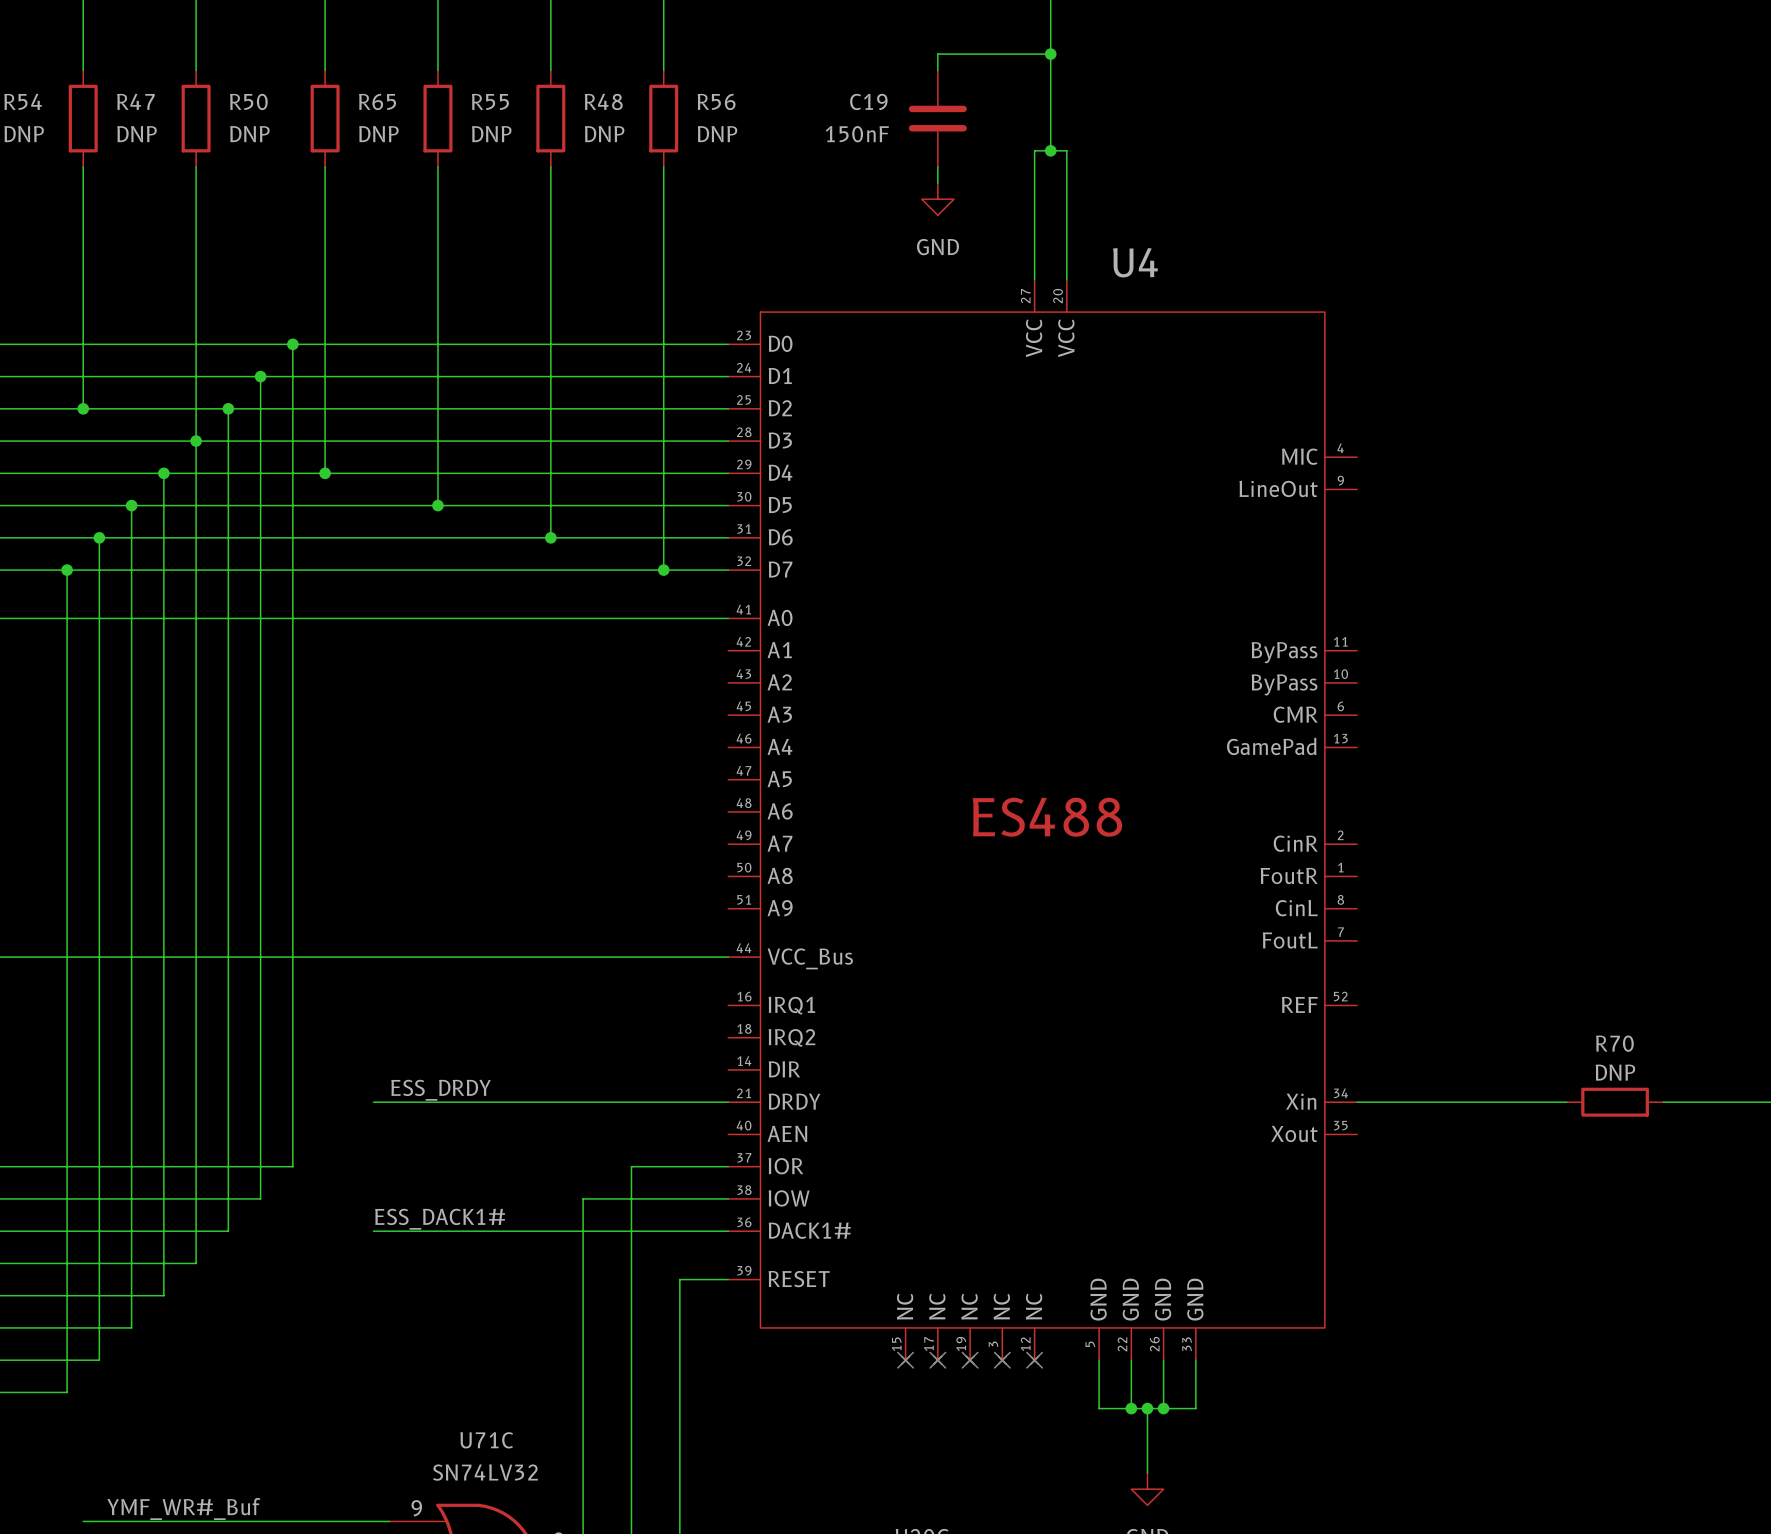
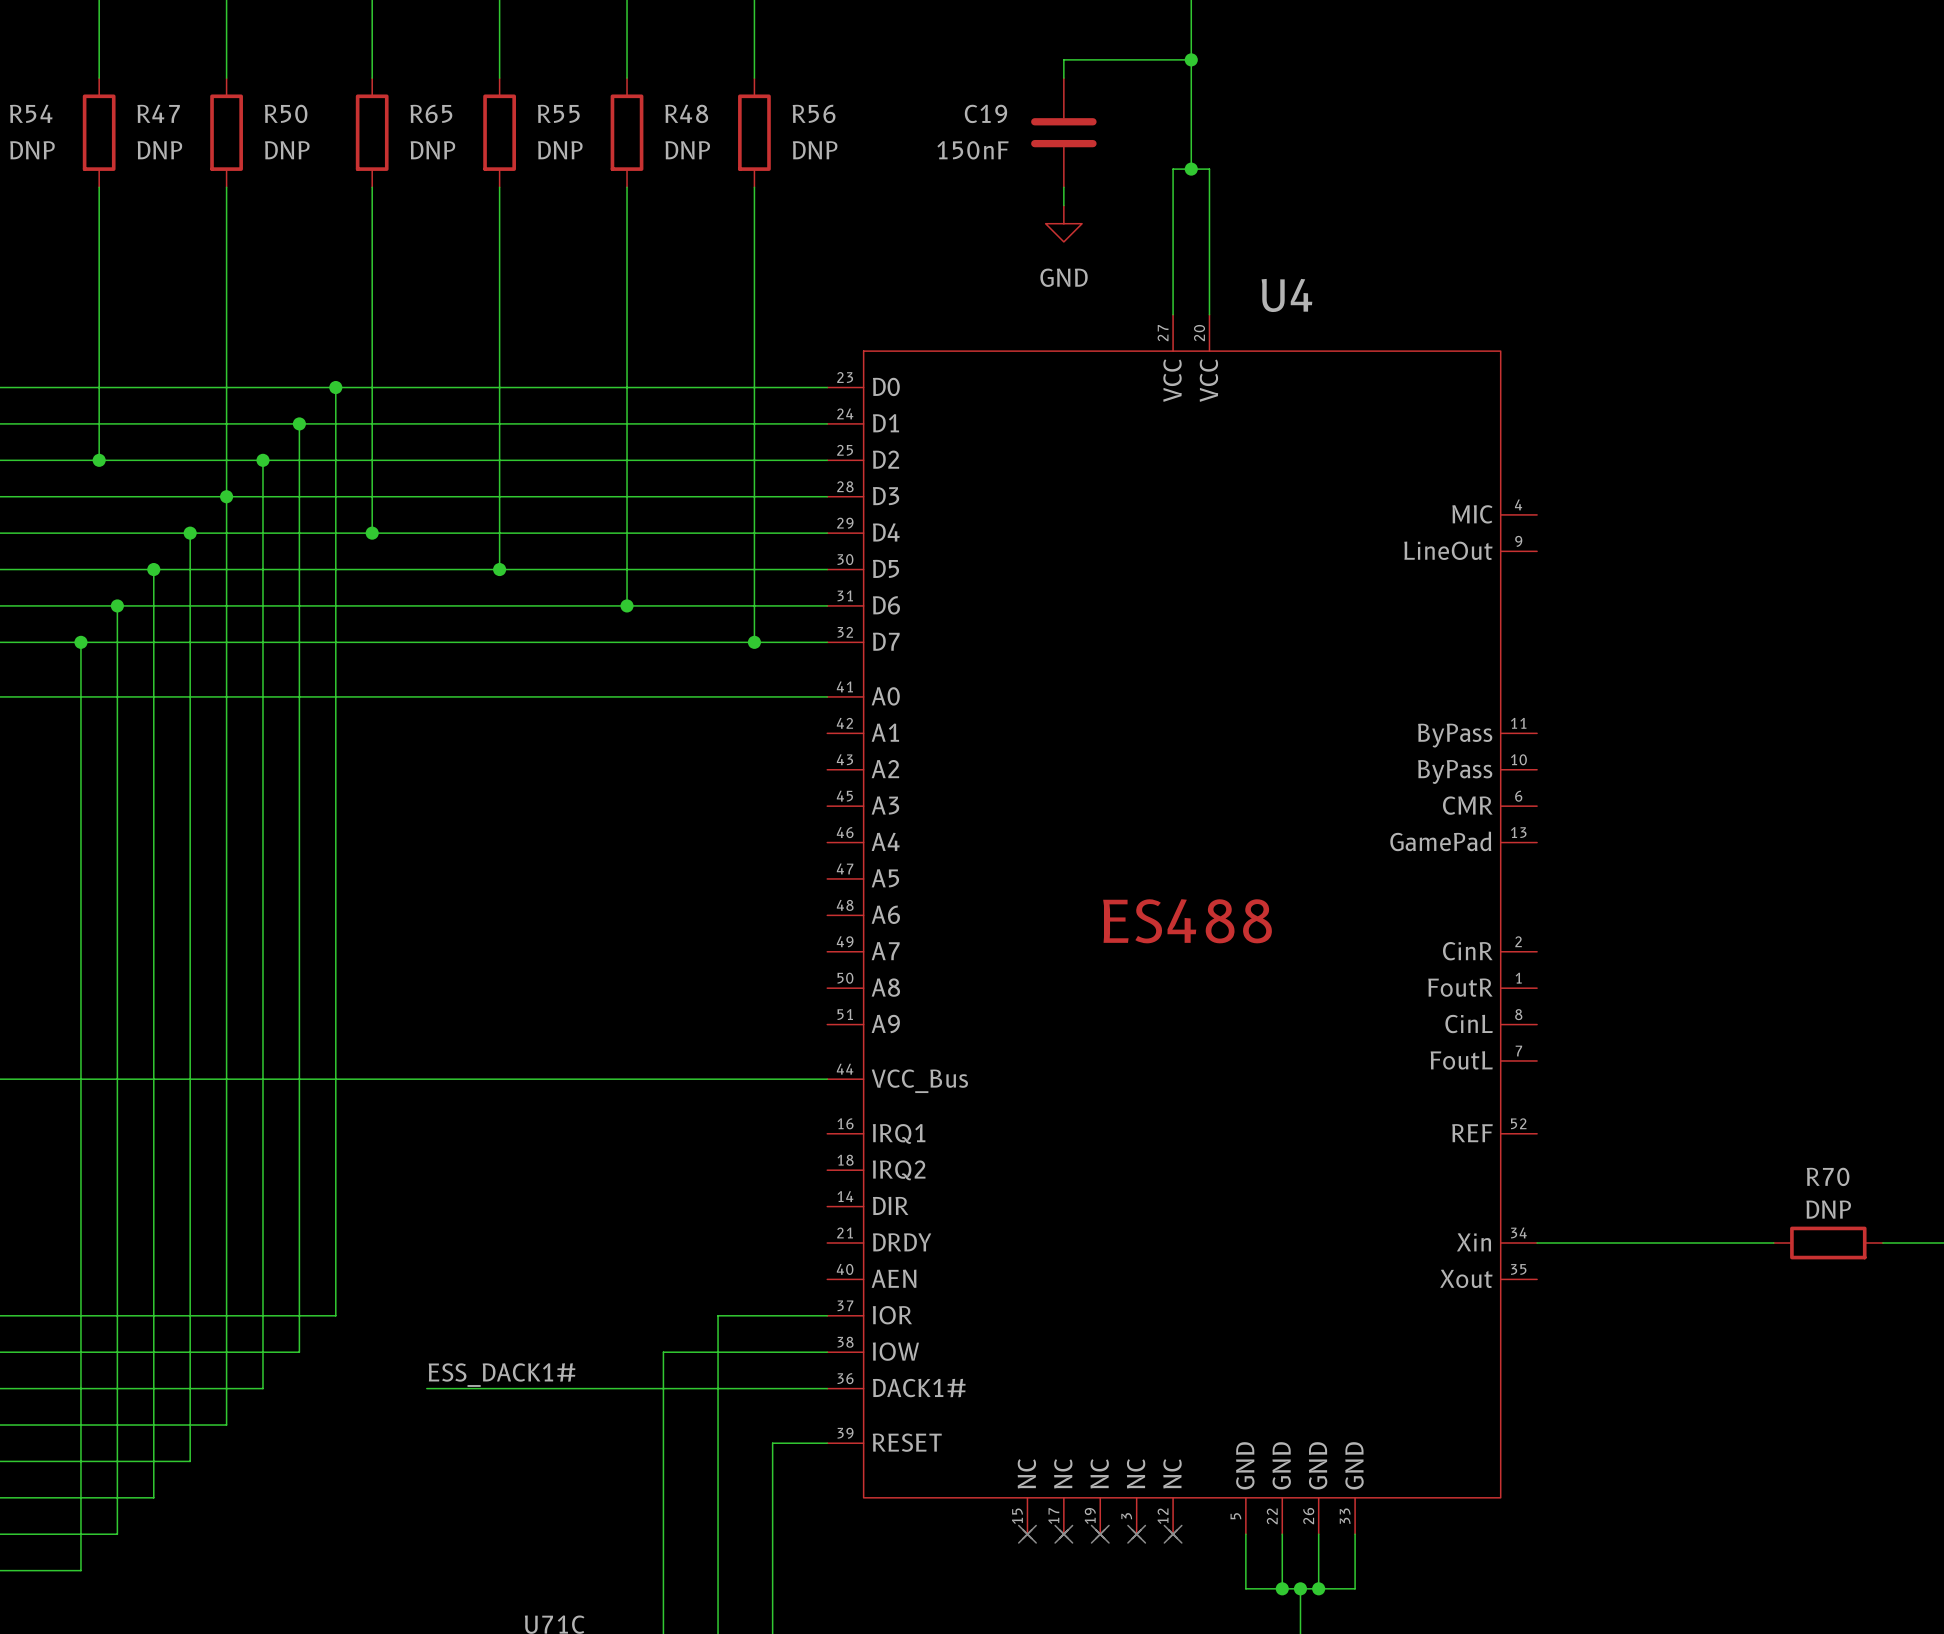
label: ESS_DRDY (441, 1090) -> none
wire: (373, 1102) (728, 1102) -> none

